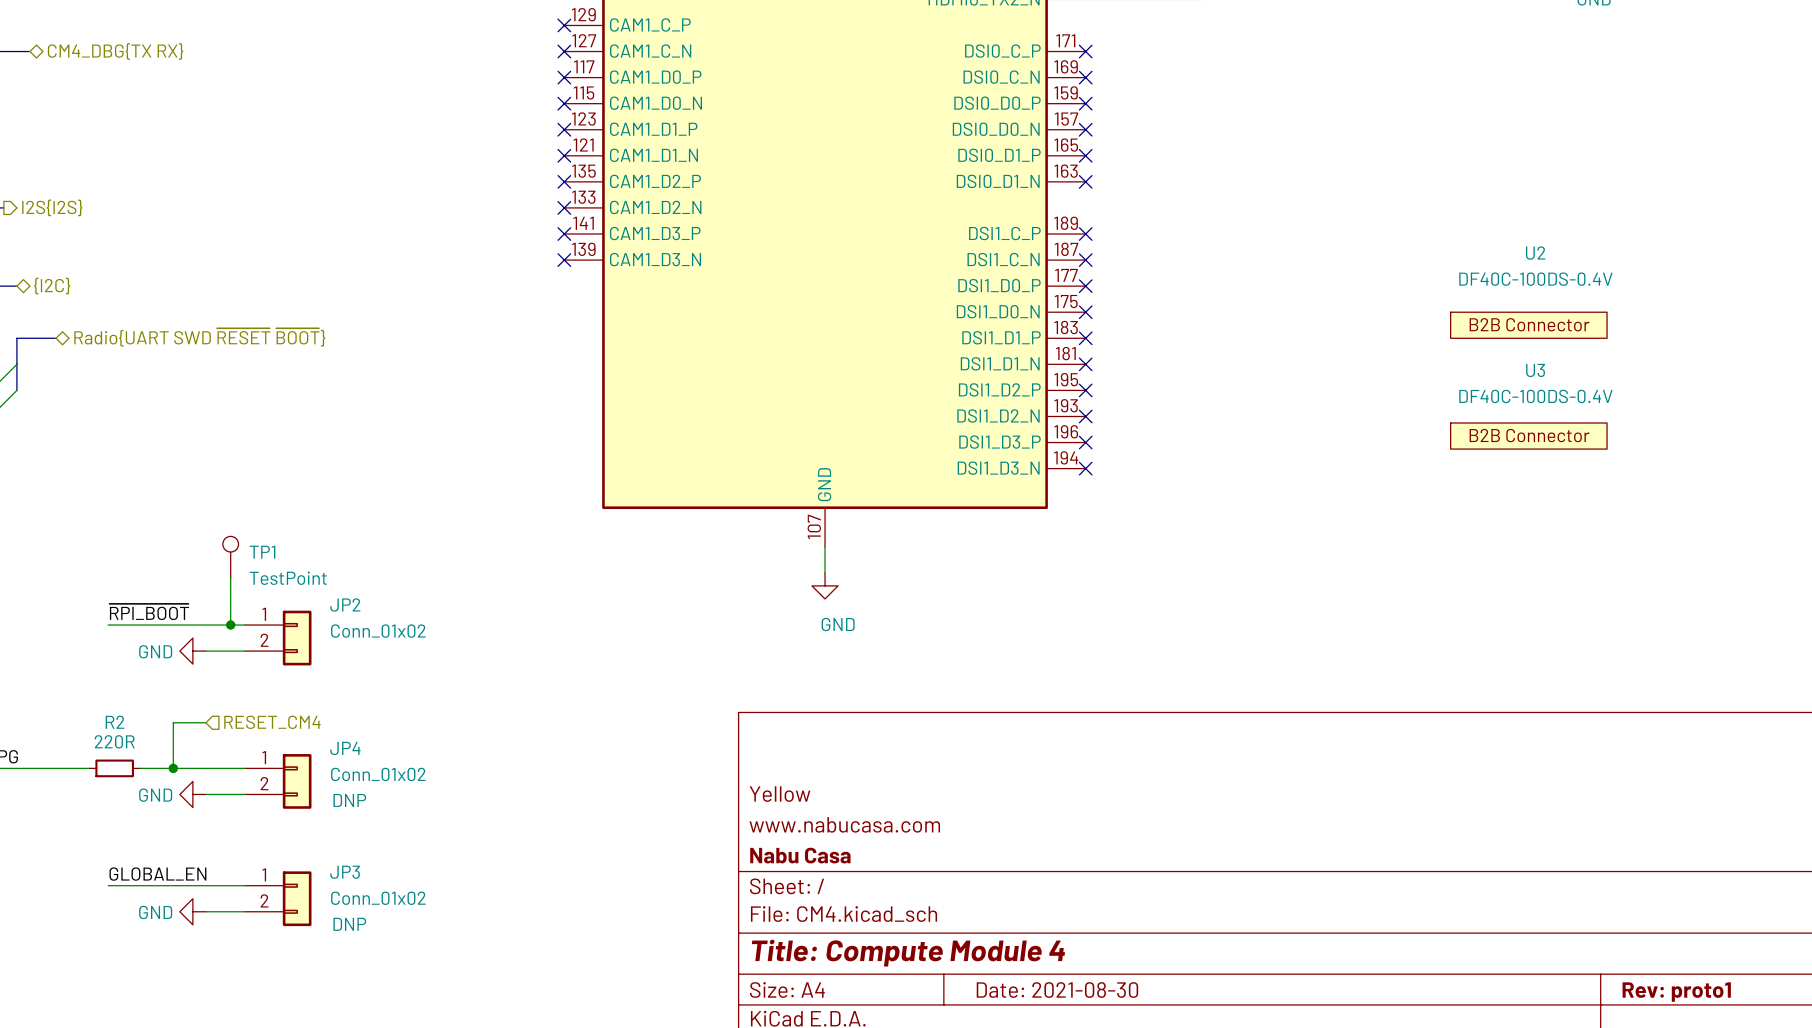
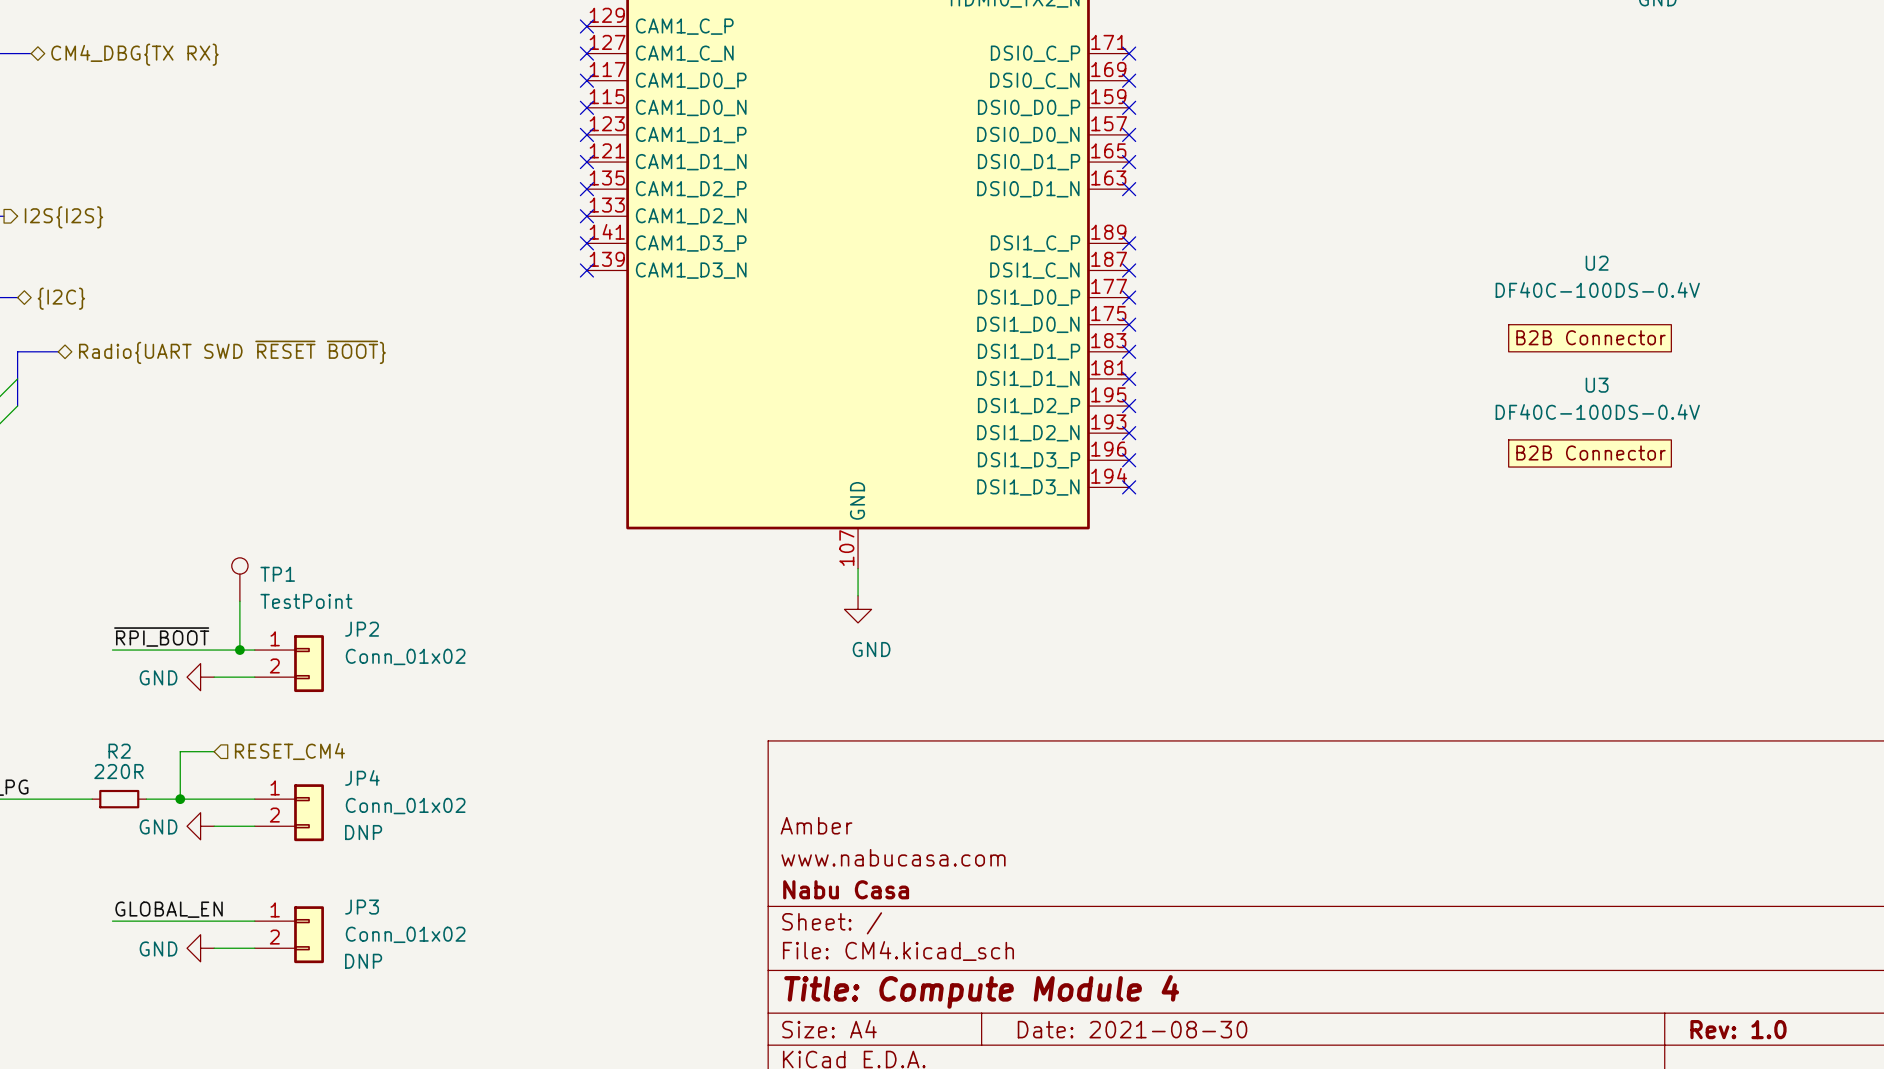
title block: Yellow (780, 794) -> Amber (816, 825)
title block: Rev: proto1 (1676, 992) -> Rev: 1.0 (1738, 1029)

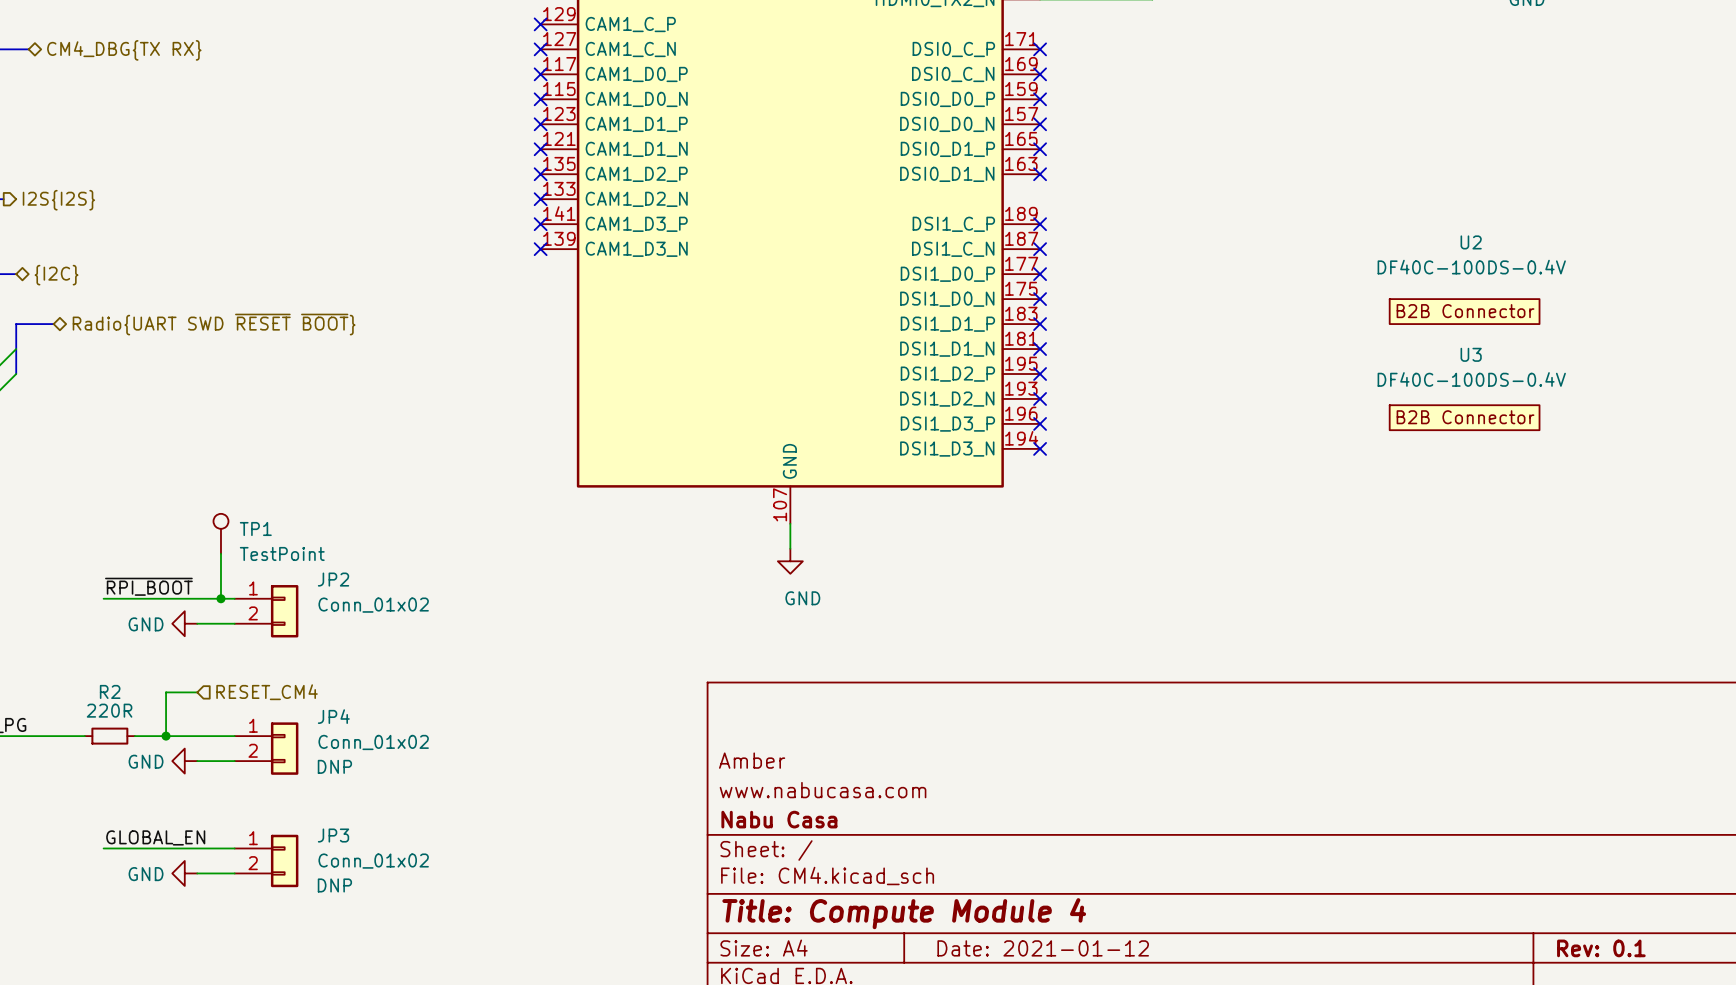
title block: Date: 2021-08-30 (1132, 1029) -> Date: 2021-01-12 (1043, 948)
title block: Rev: 1.0 (1738, 1029) -> Rev: 0.1 (1601, 948)

